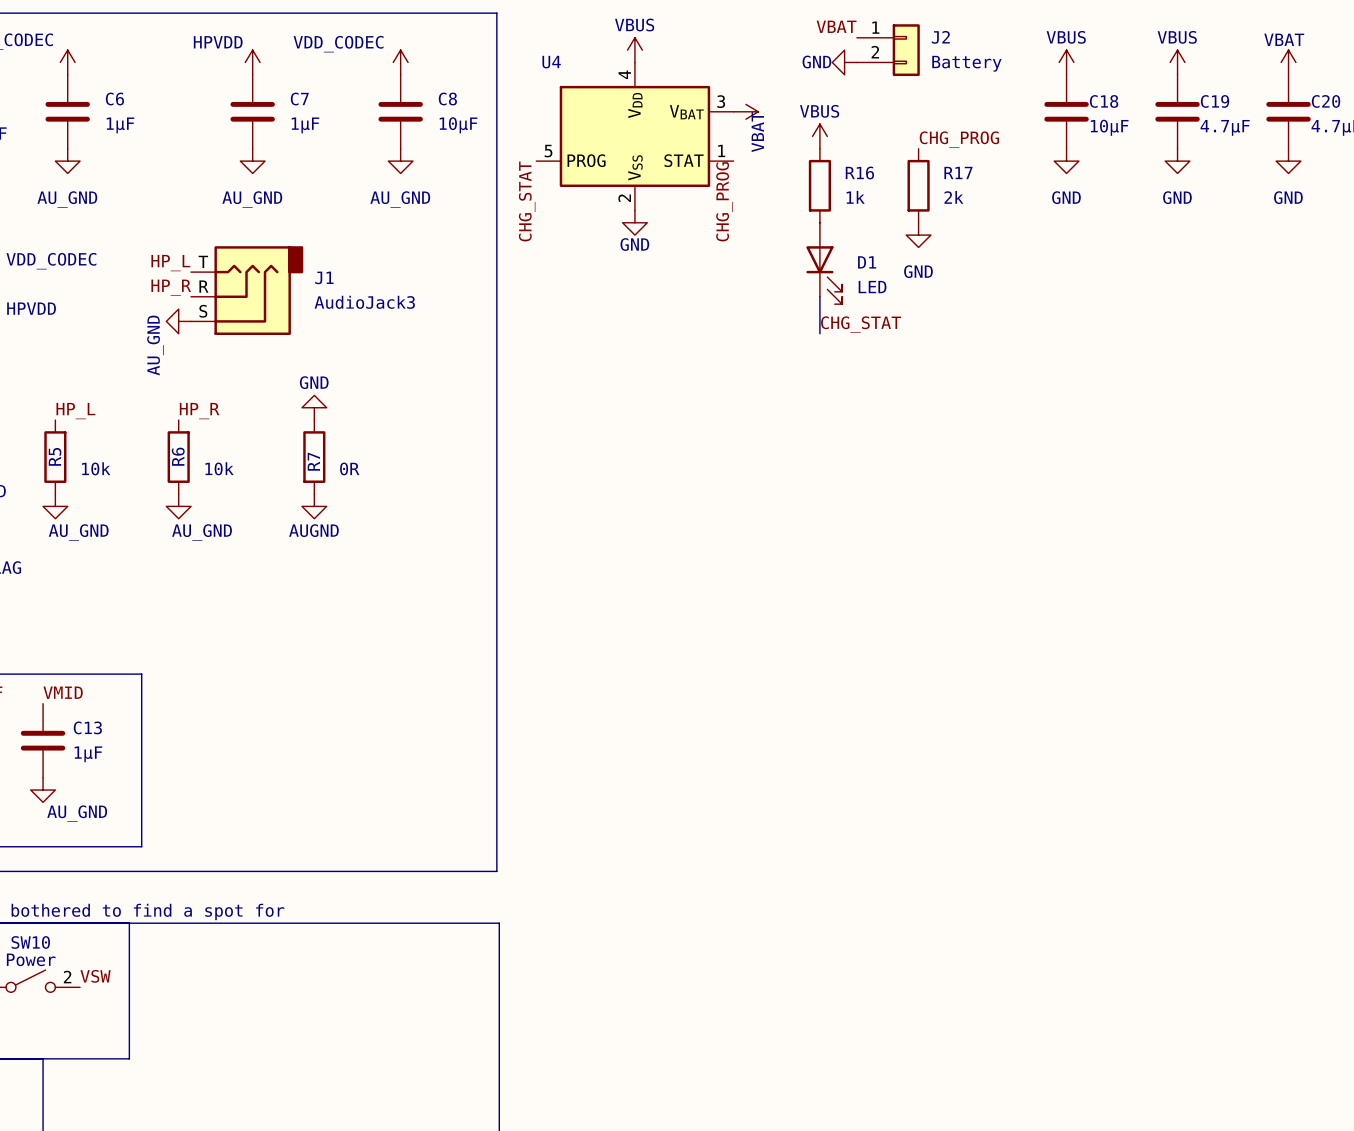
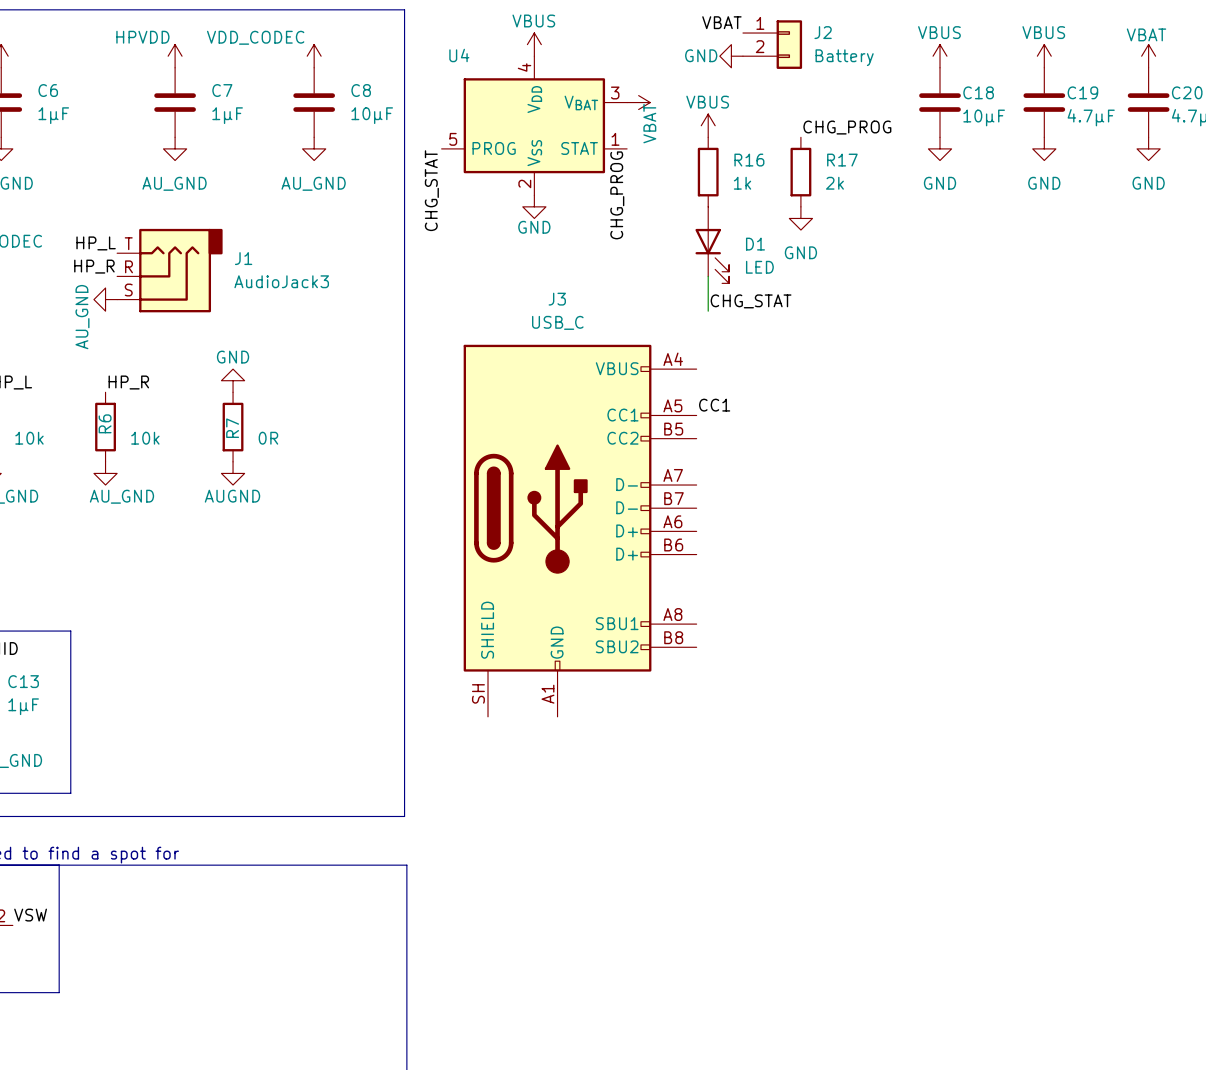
label: none -> CC1 (714, 405)
J3: none -> USB_C (580, 530)

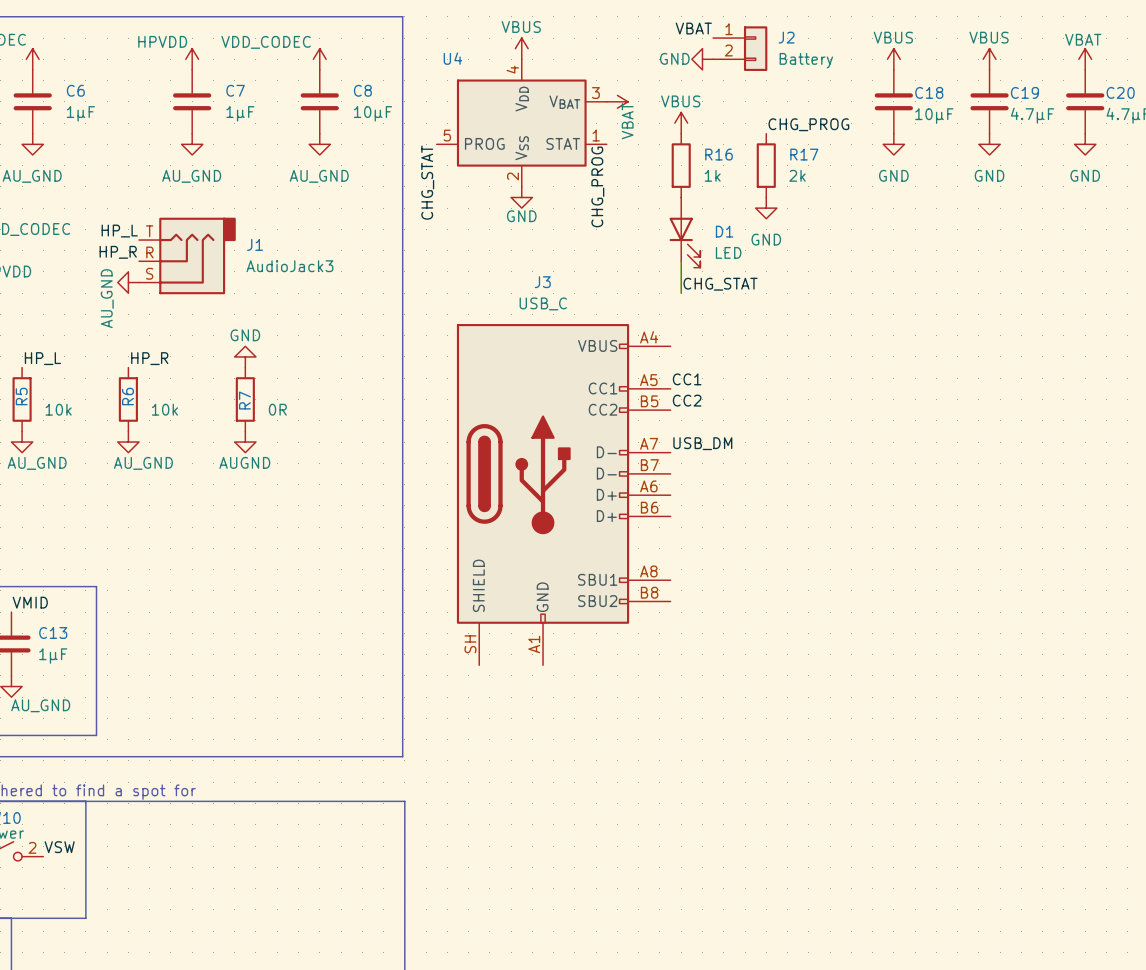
label: none -> CC2 (687, 400)
label: none -> USB_DM (702, 443)

